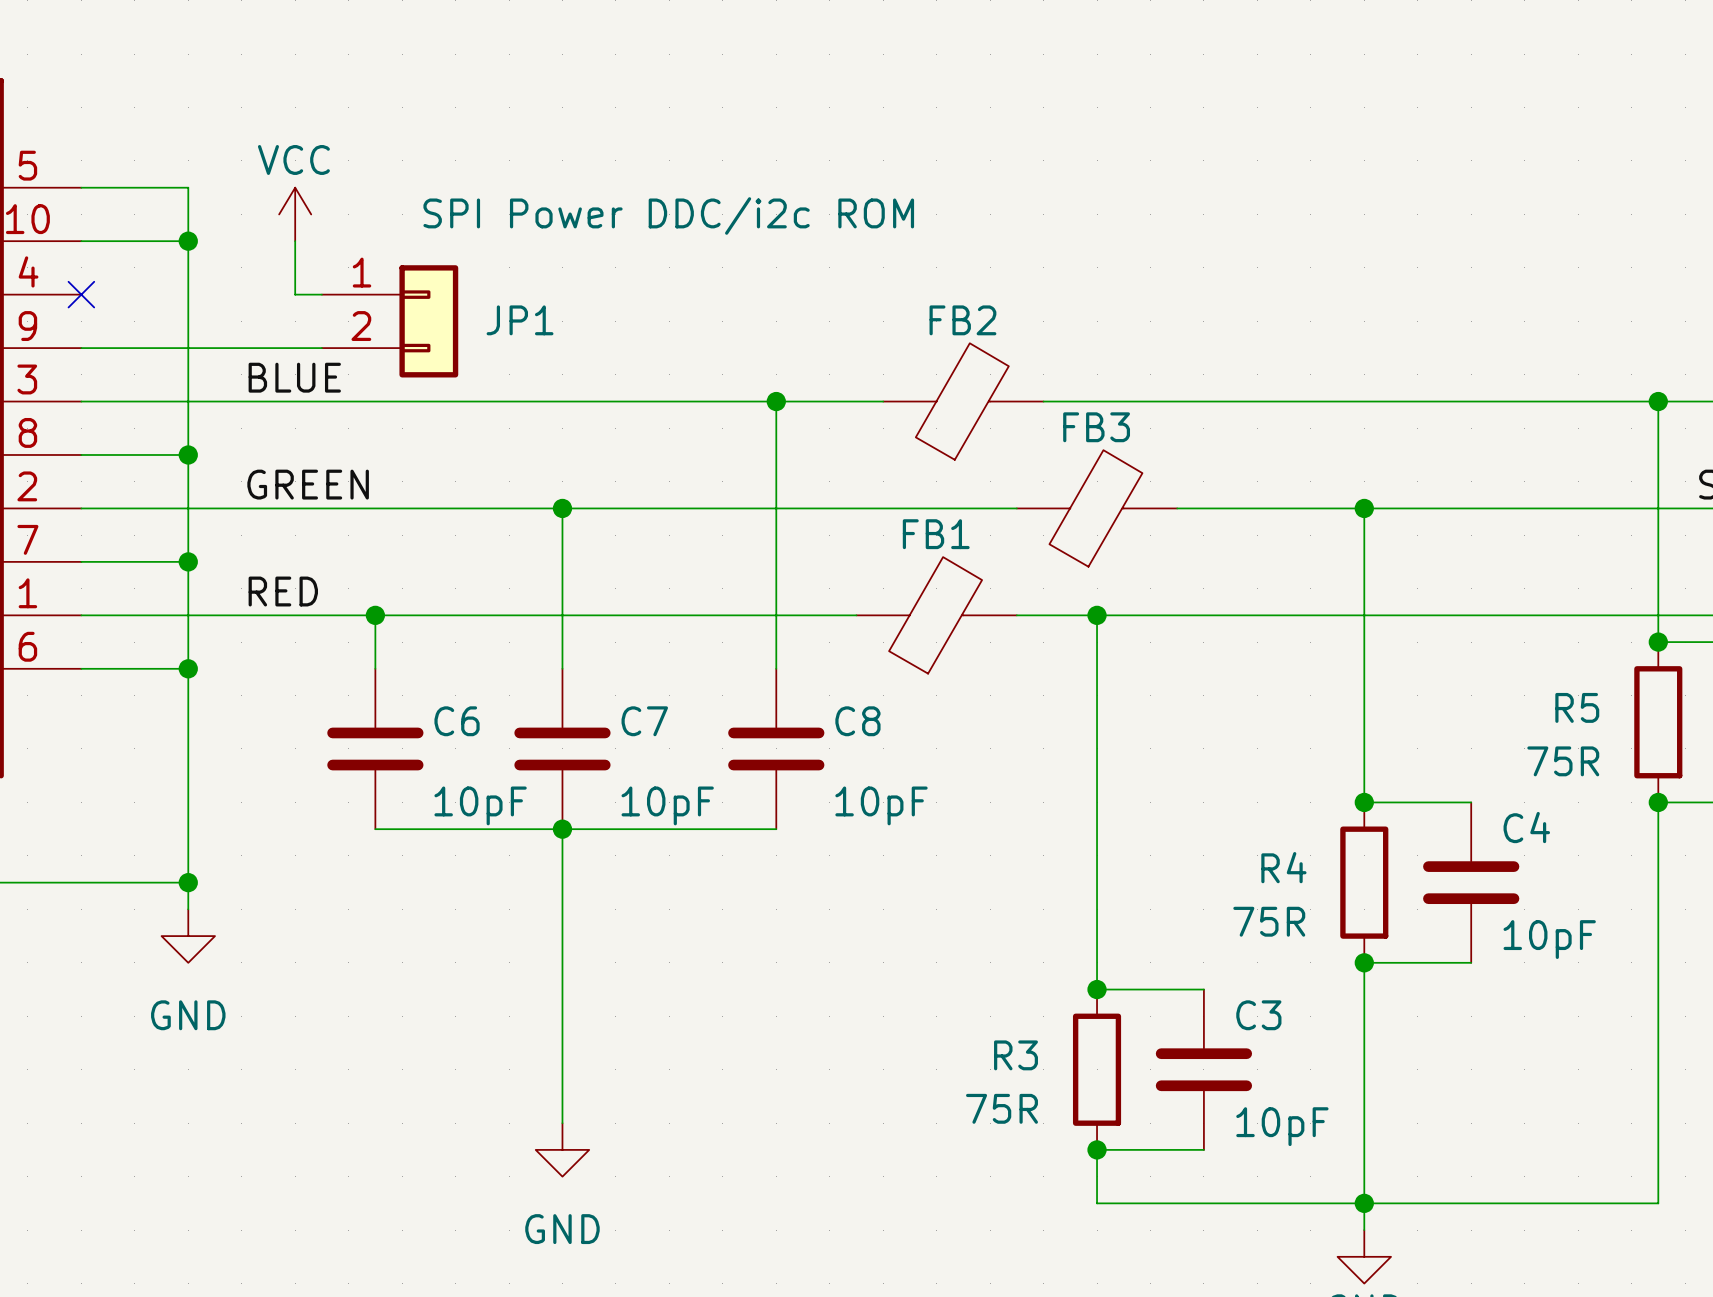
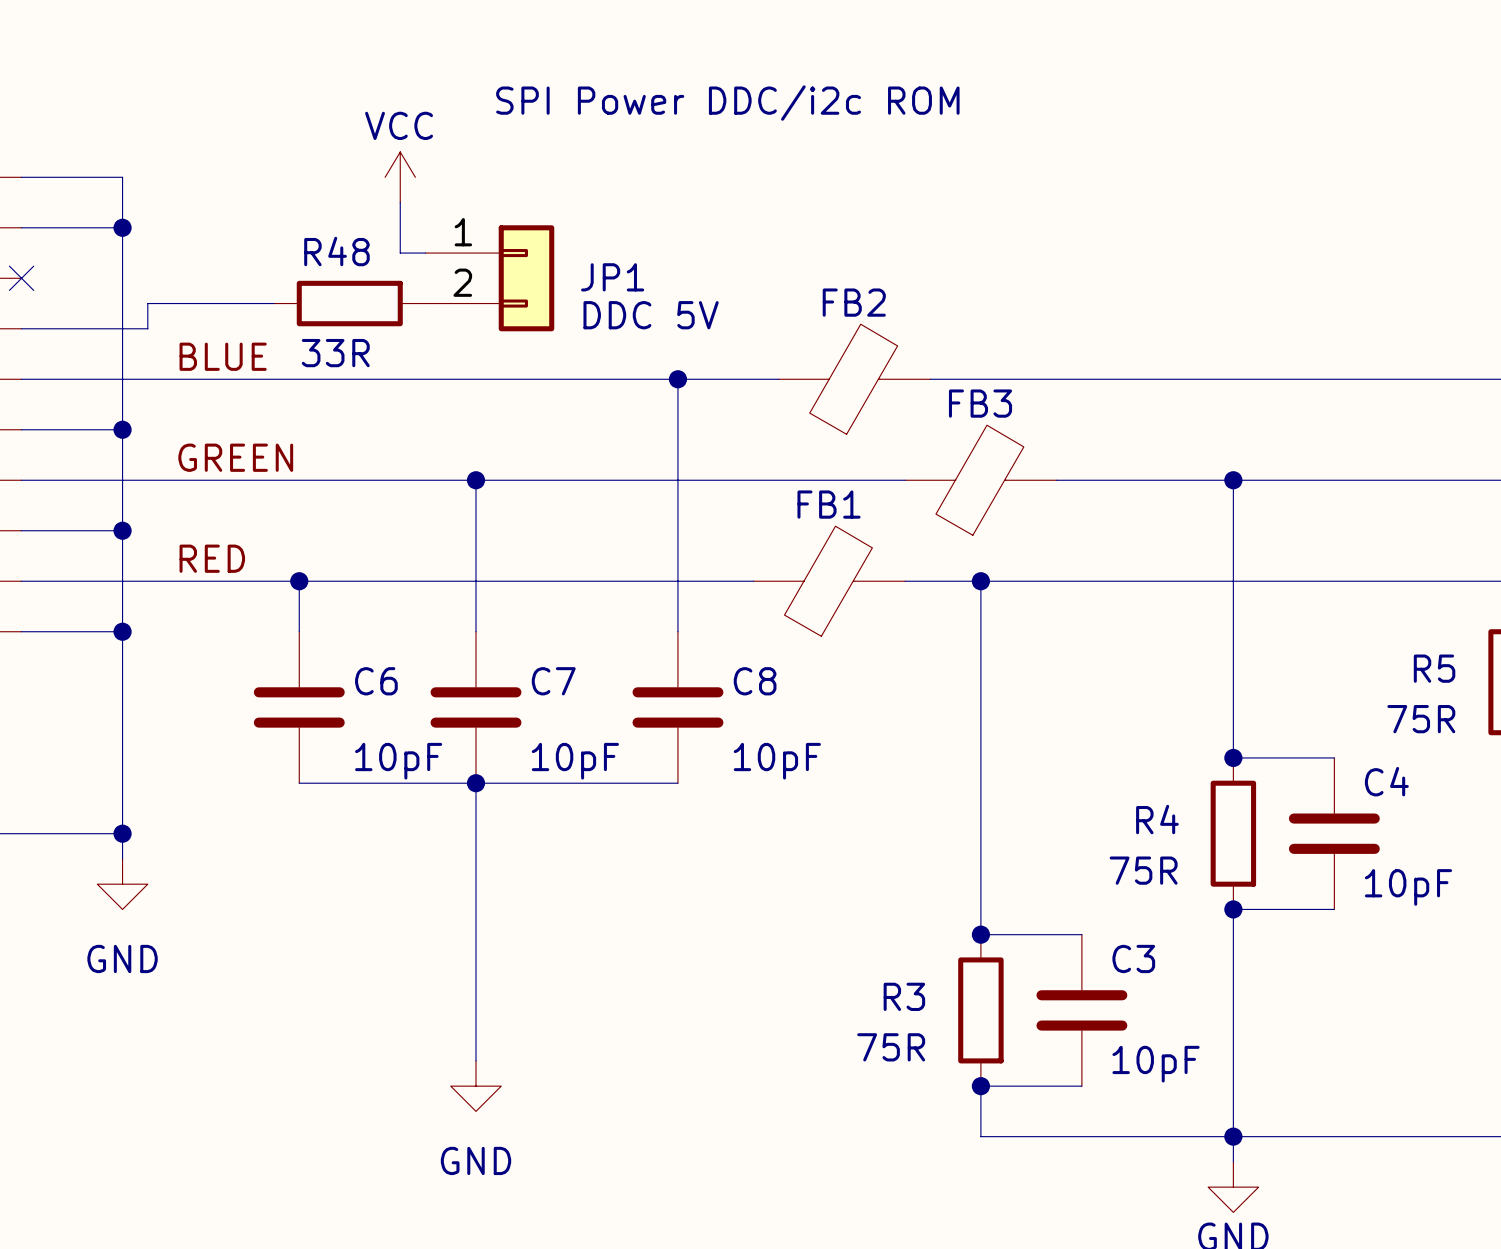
power symbol position: VCC (295, 214) -> VCC (400, 177)
JP1 text position: SPI Power DDC/i2c ROM (668, 215) -> SPI Power DDC/i2c ROM (727, 103)
wire: (295, 241) (295, 294) (321, 294) -> (400, 202) (400, 253) (425, 253)
JP1 position: (390, 321) -> (489, 278)
R48: none -> 33R (349, 303)
JP1 value: none -> DDC 5V (651, 315)
wire: (215, 348) (321, 348) -> (147, 328) (147, 303) (274, 303)

